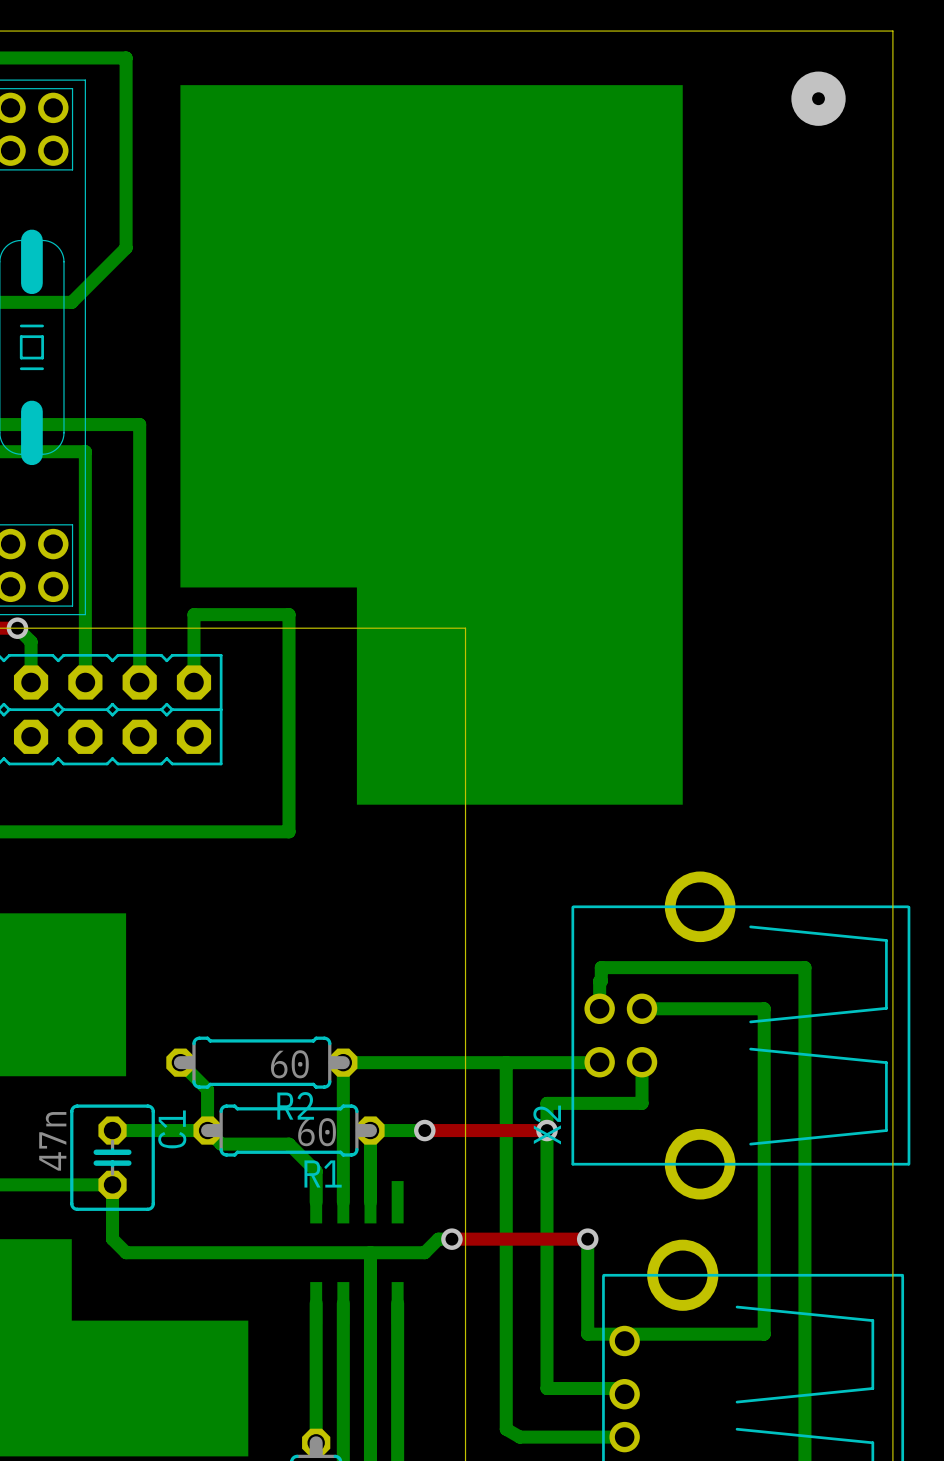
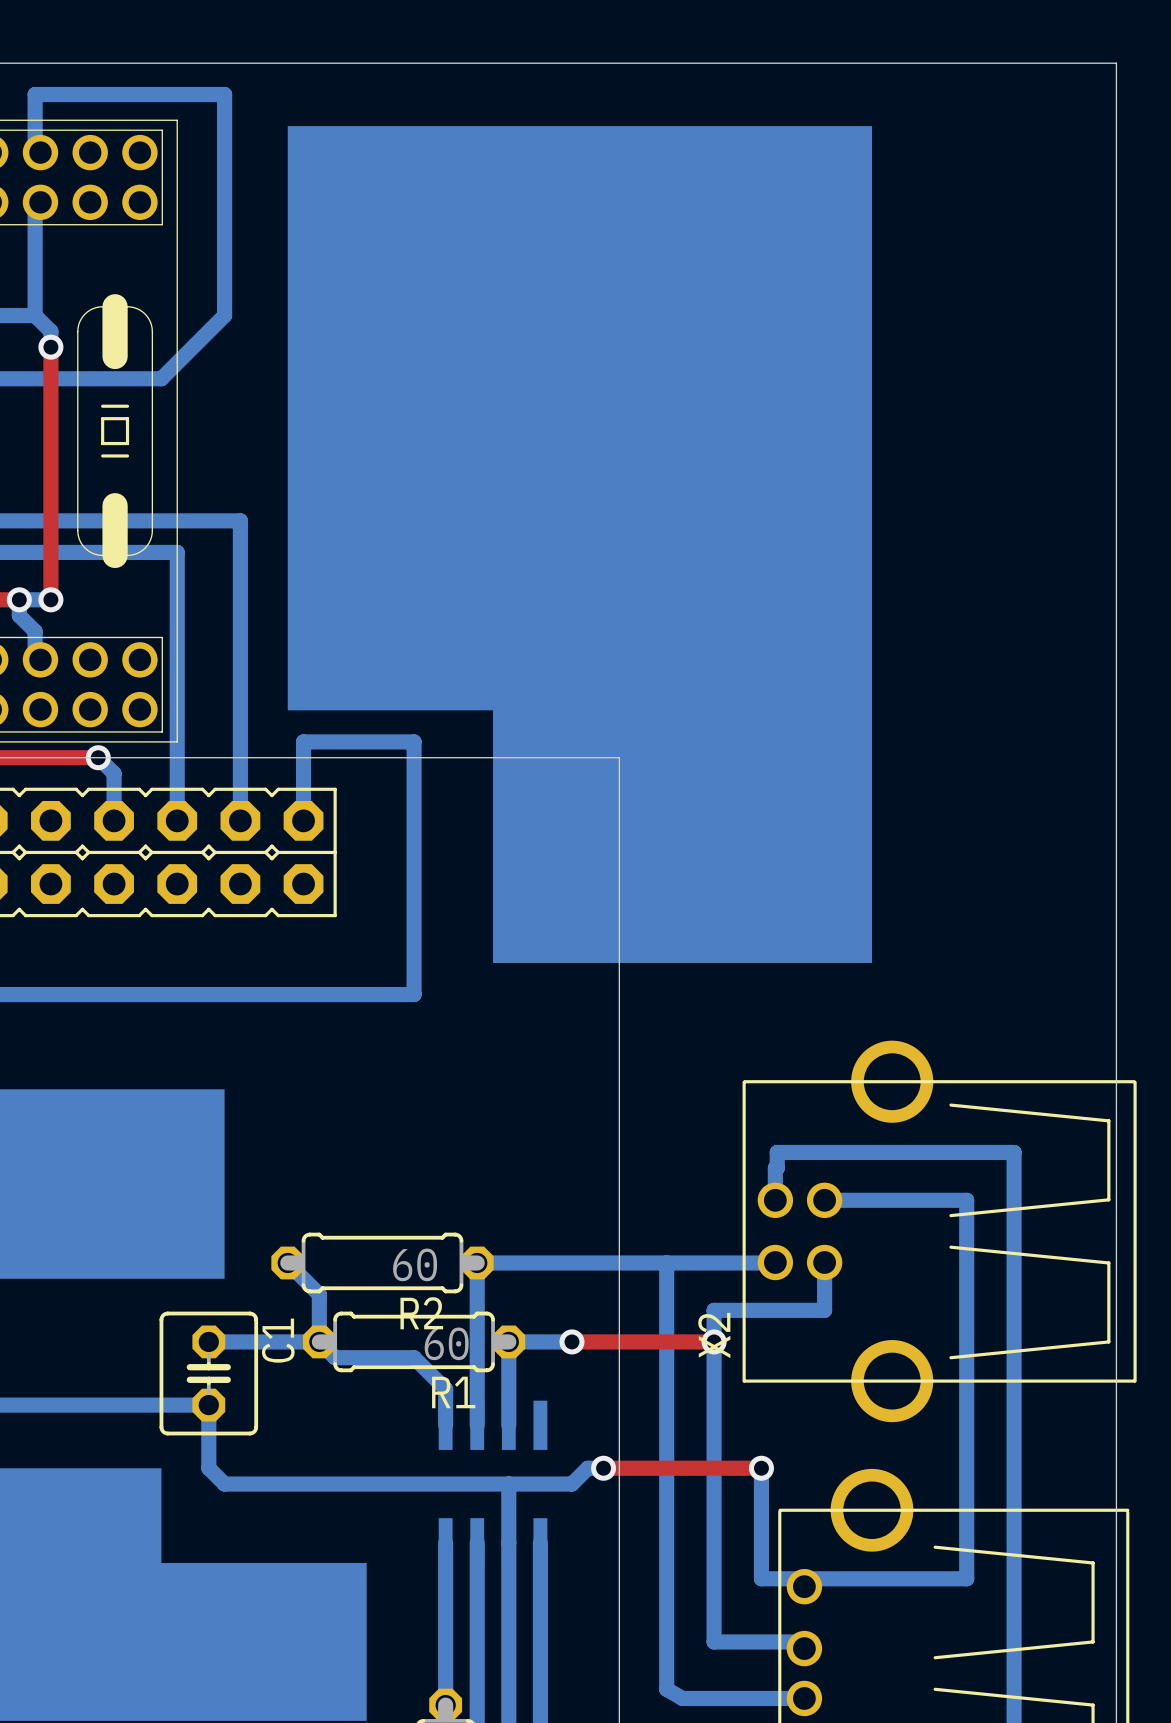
via: (818, 98) -> none
C1 value: 47n (52, 1141) -> none

